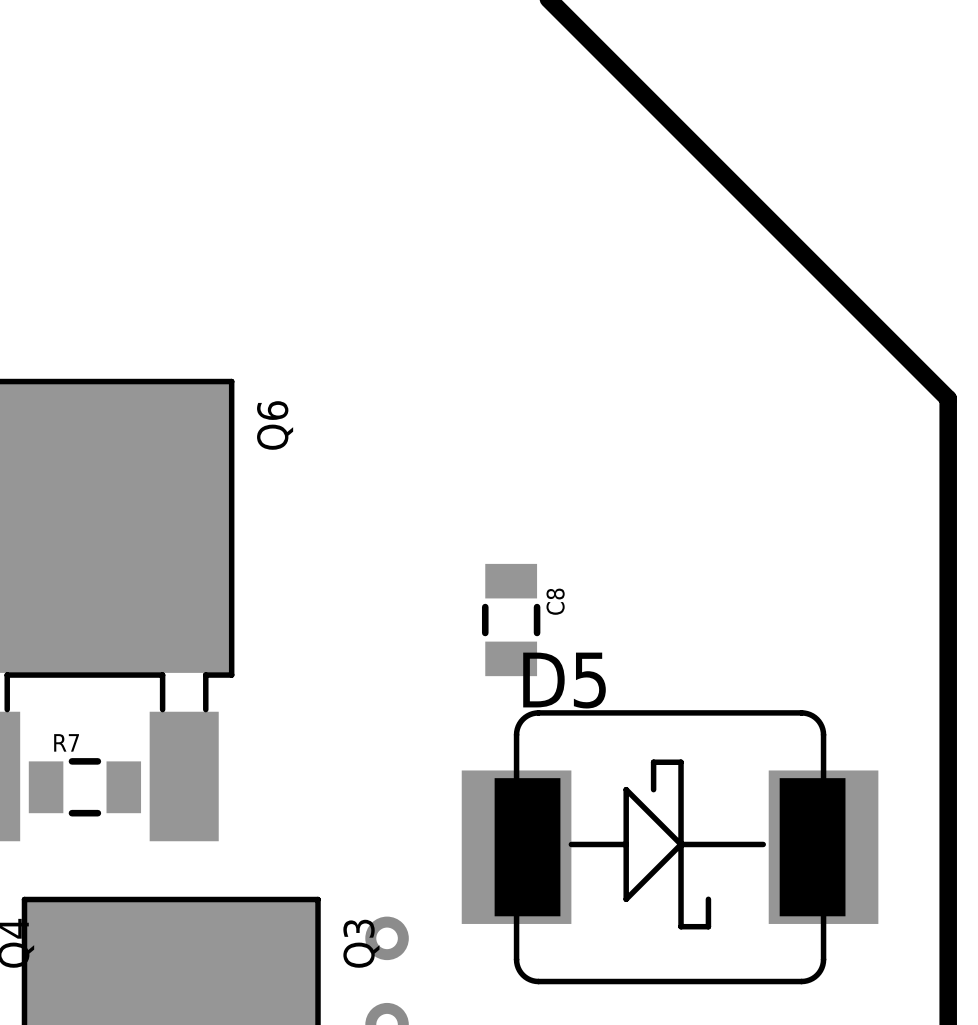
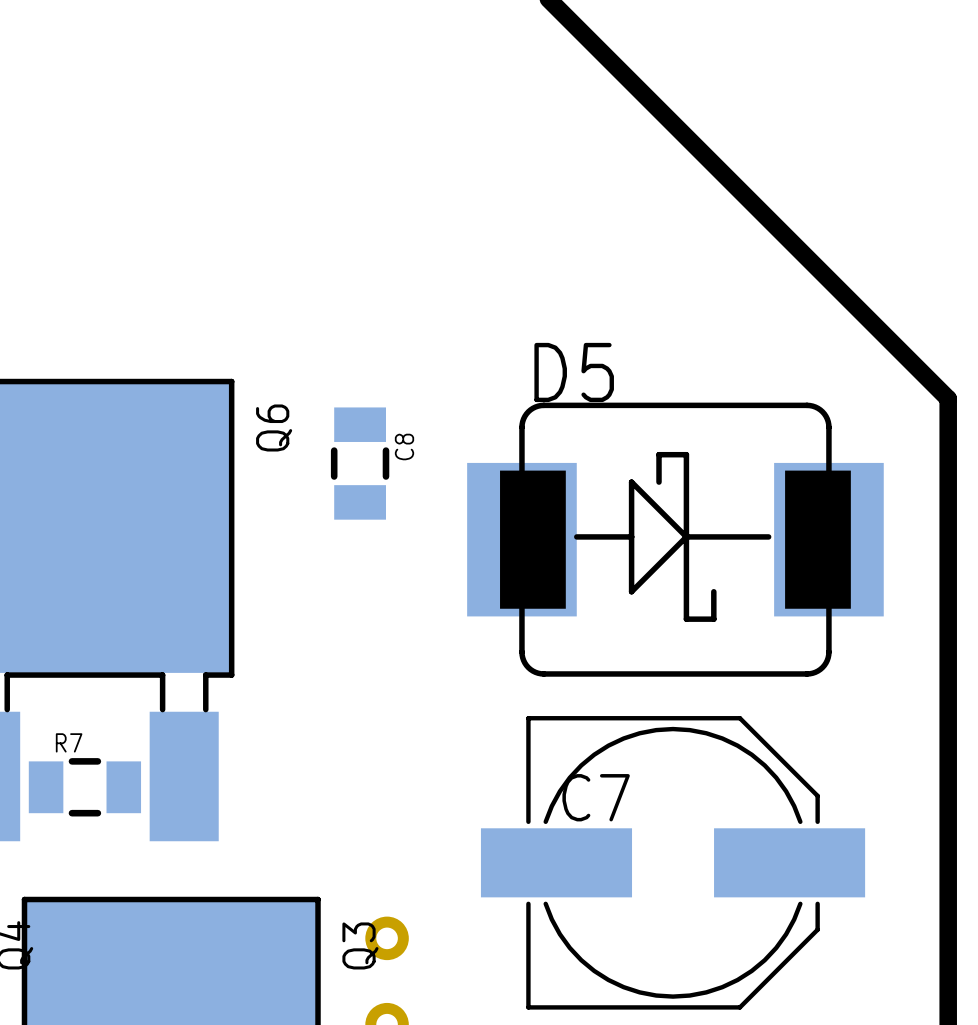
C8 position: (511, 620) -> (360, 463)
D5 position: (670, 847) -> (675, 539)
C7: none -> (673, 862)

